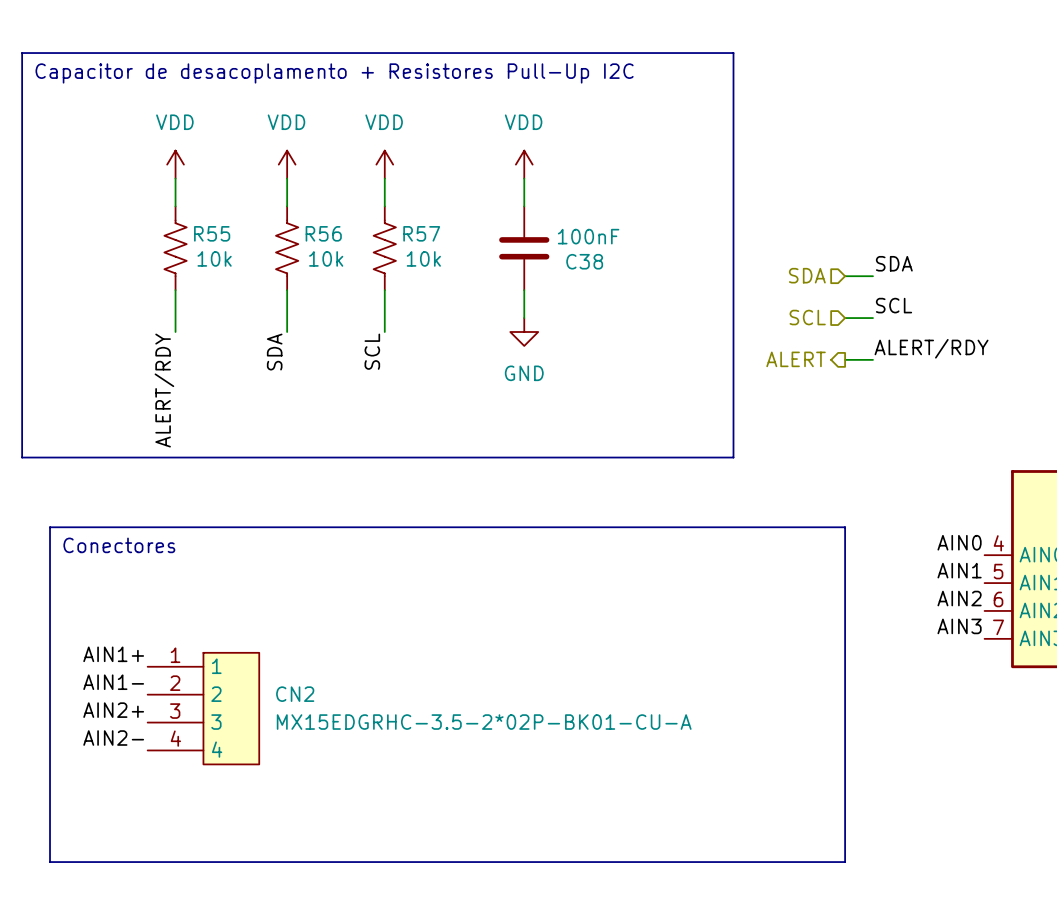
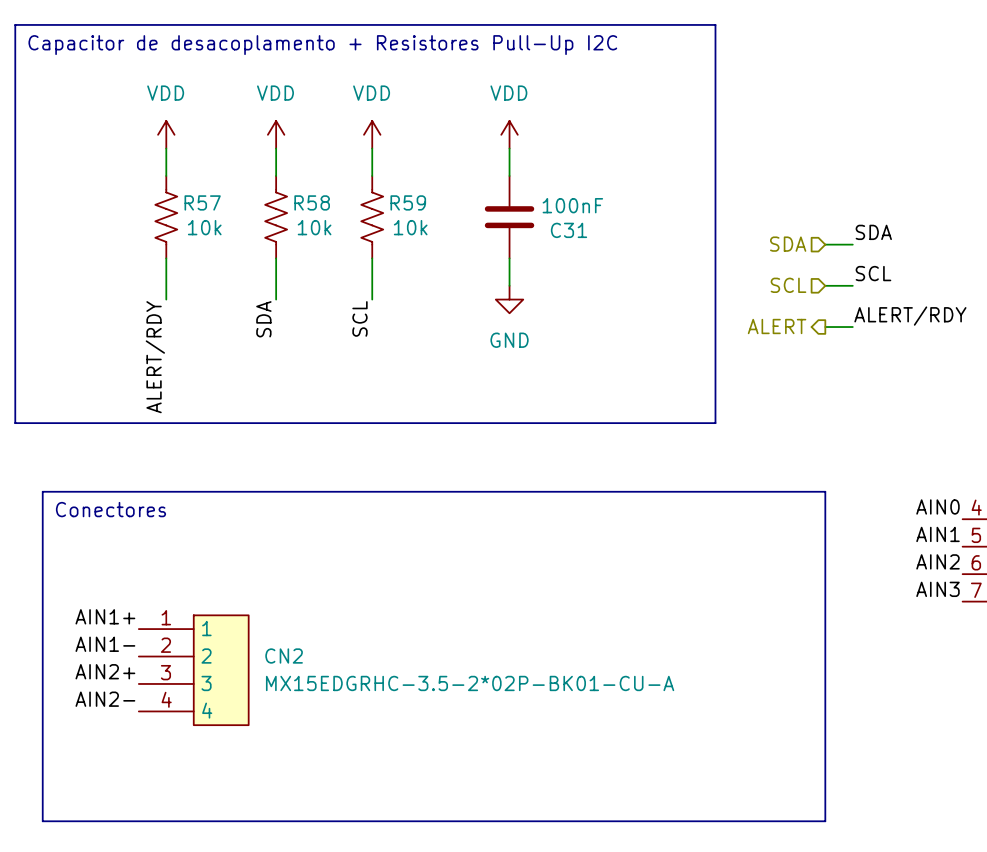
R55 name: R55 (212, 233) -> R57 (202, 202)
R56 name: R56 (323, 233) -> R58 (312, 202)
R57 name: R57 (421, 233) -> R59 (408, 202)
C38 name: C38 (584, 261) -> C31 (569, 230)

